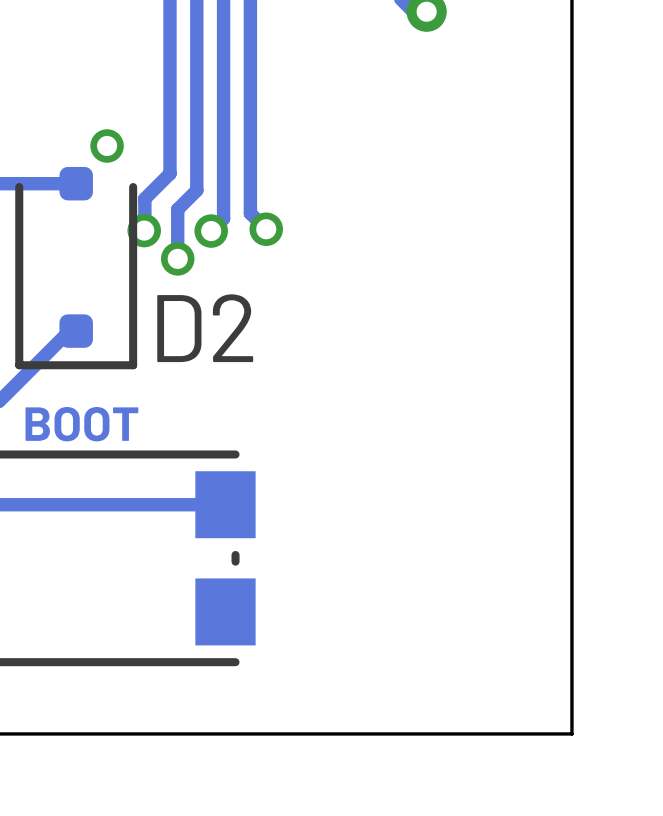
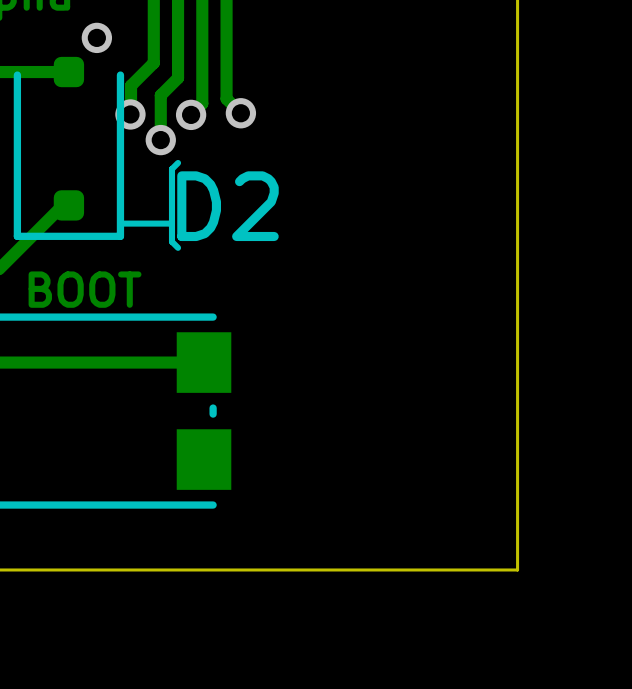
line: none -> (178, 162) (171, 169) (171, 241) (178, 247)
D2 name position: D2 (205, 328) -> D2 (228, 206)
line: none -> (171, 223) (120, 223)

